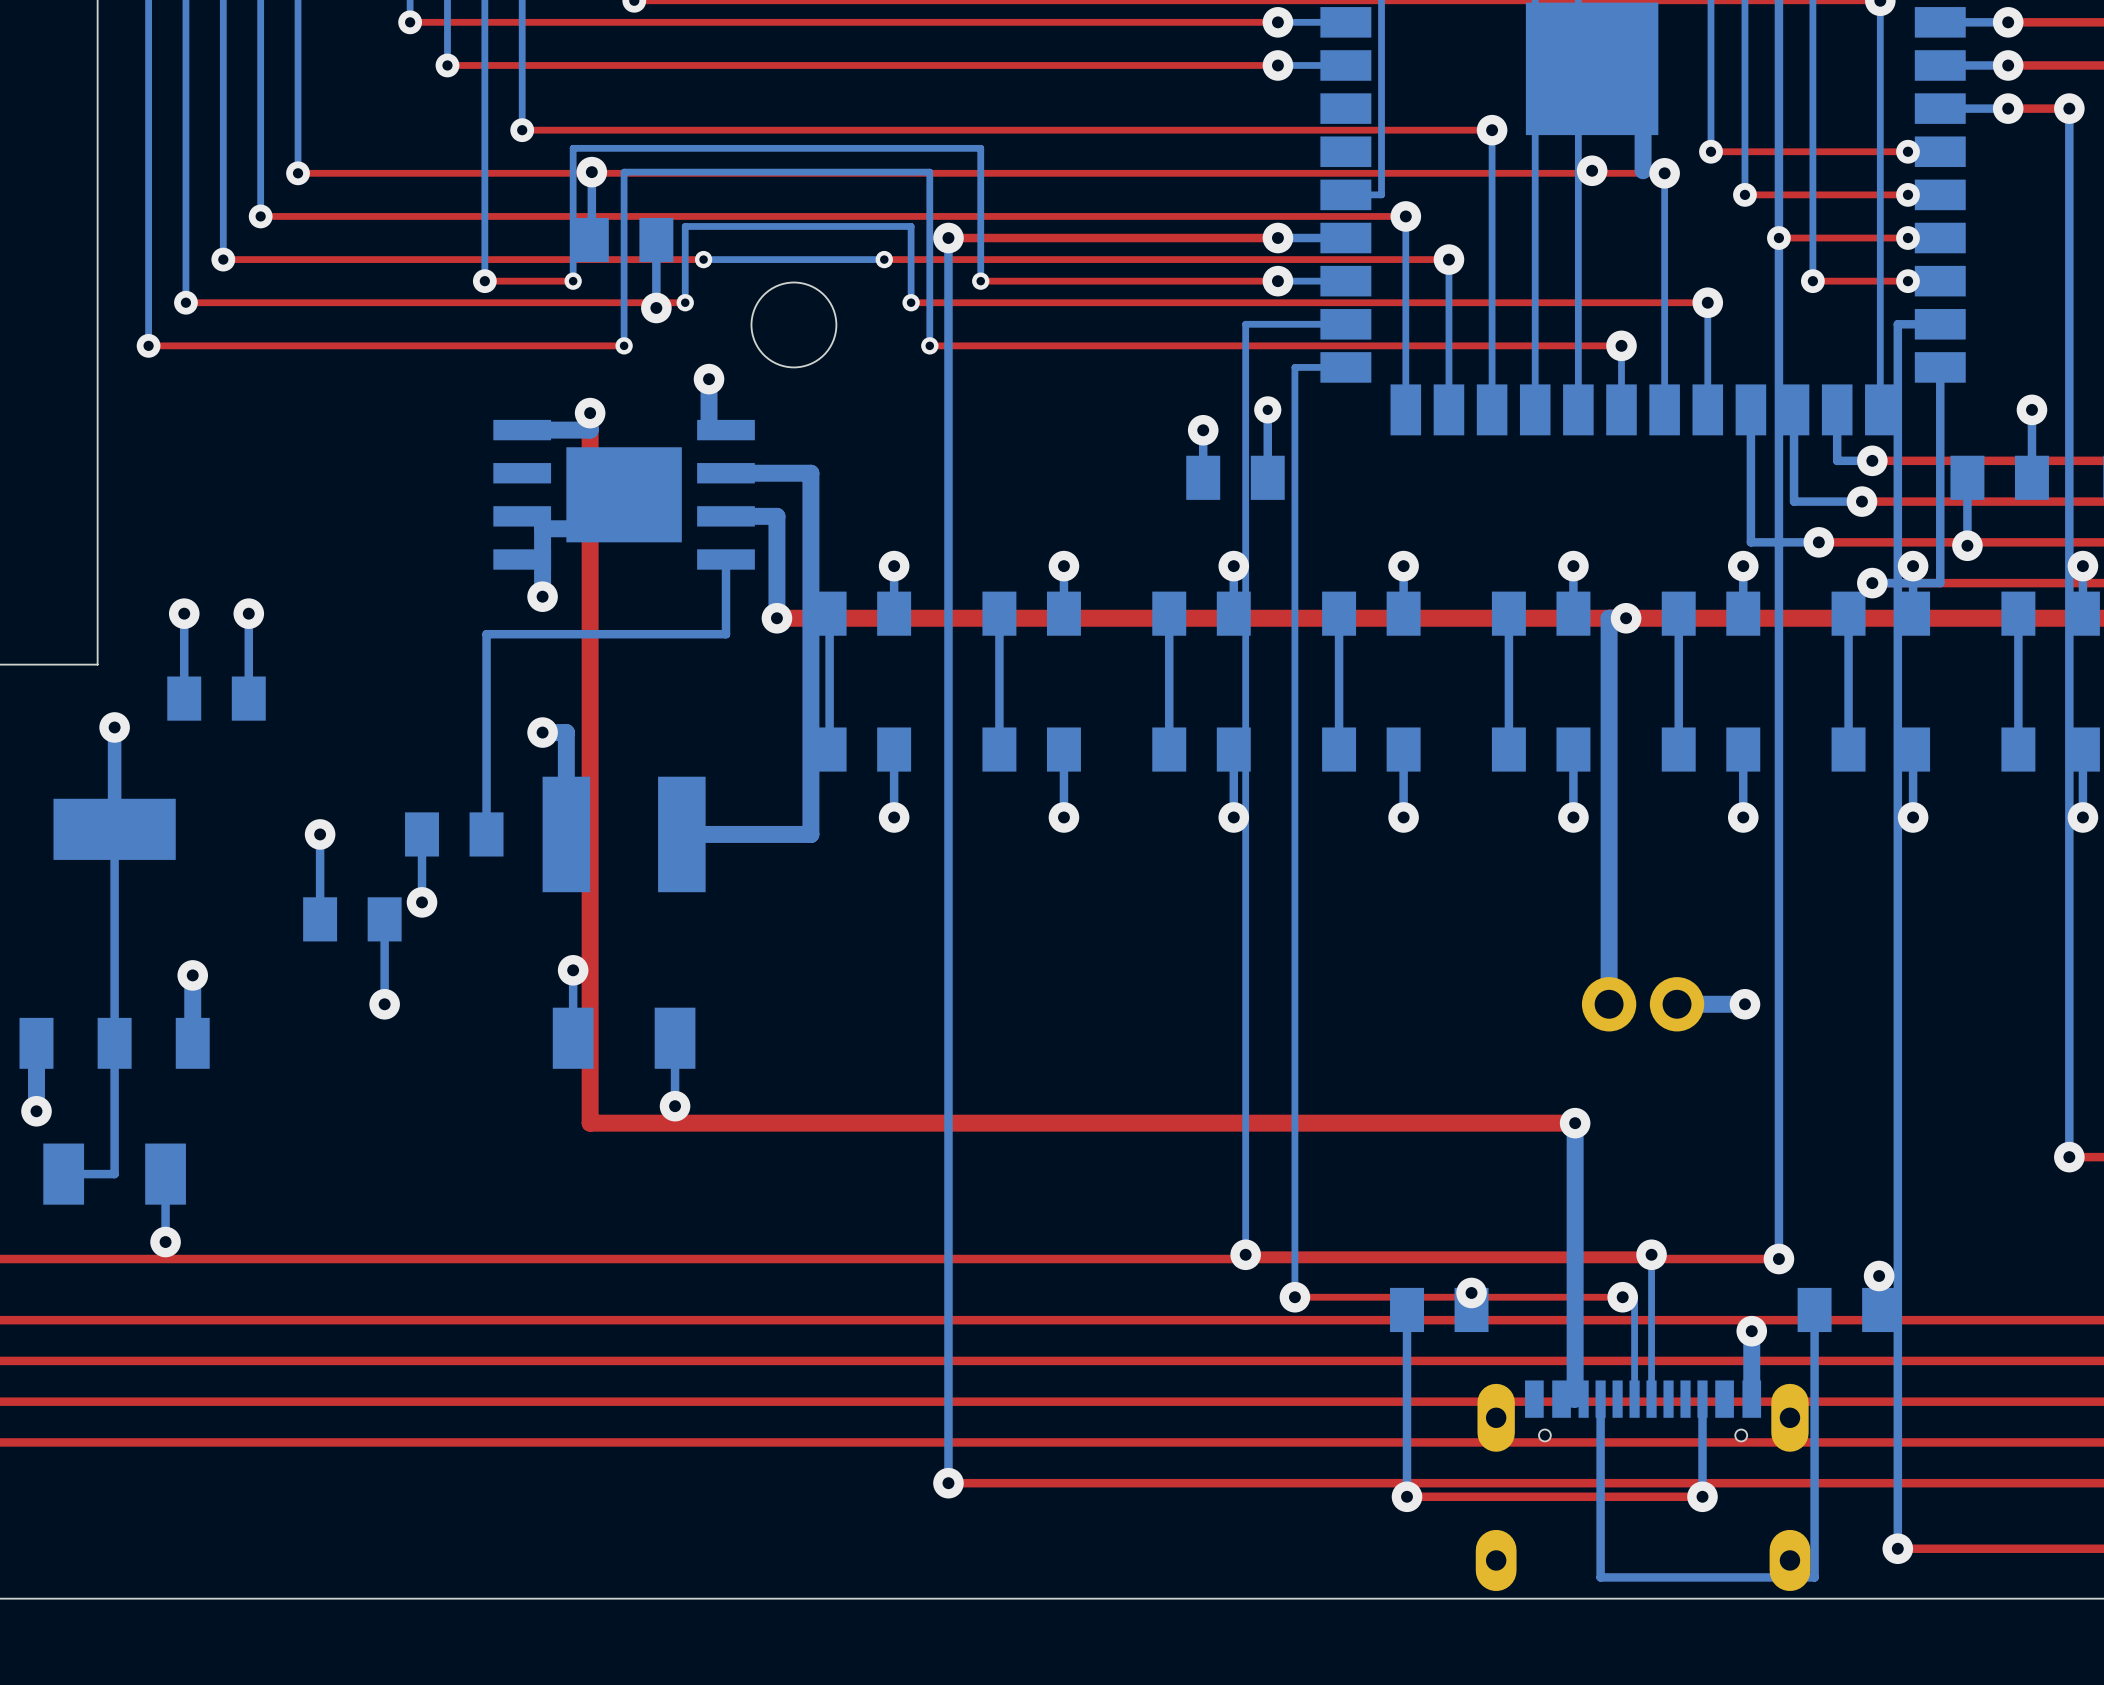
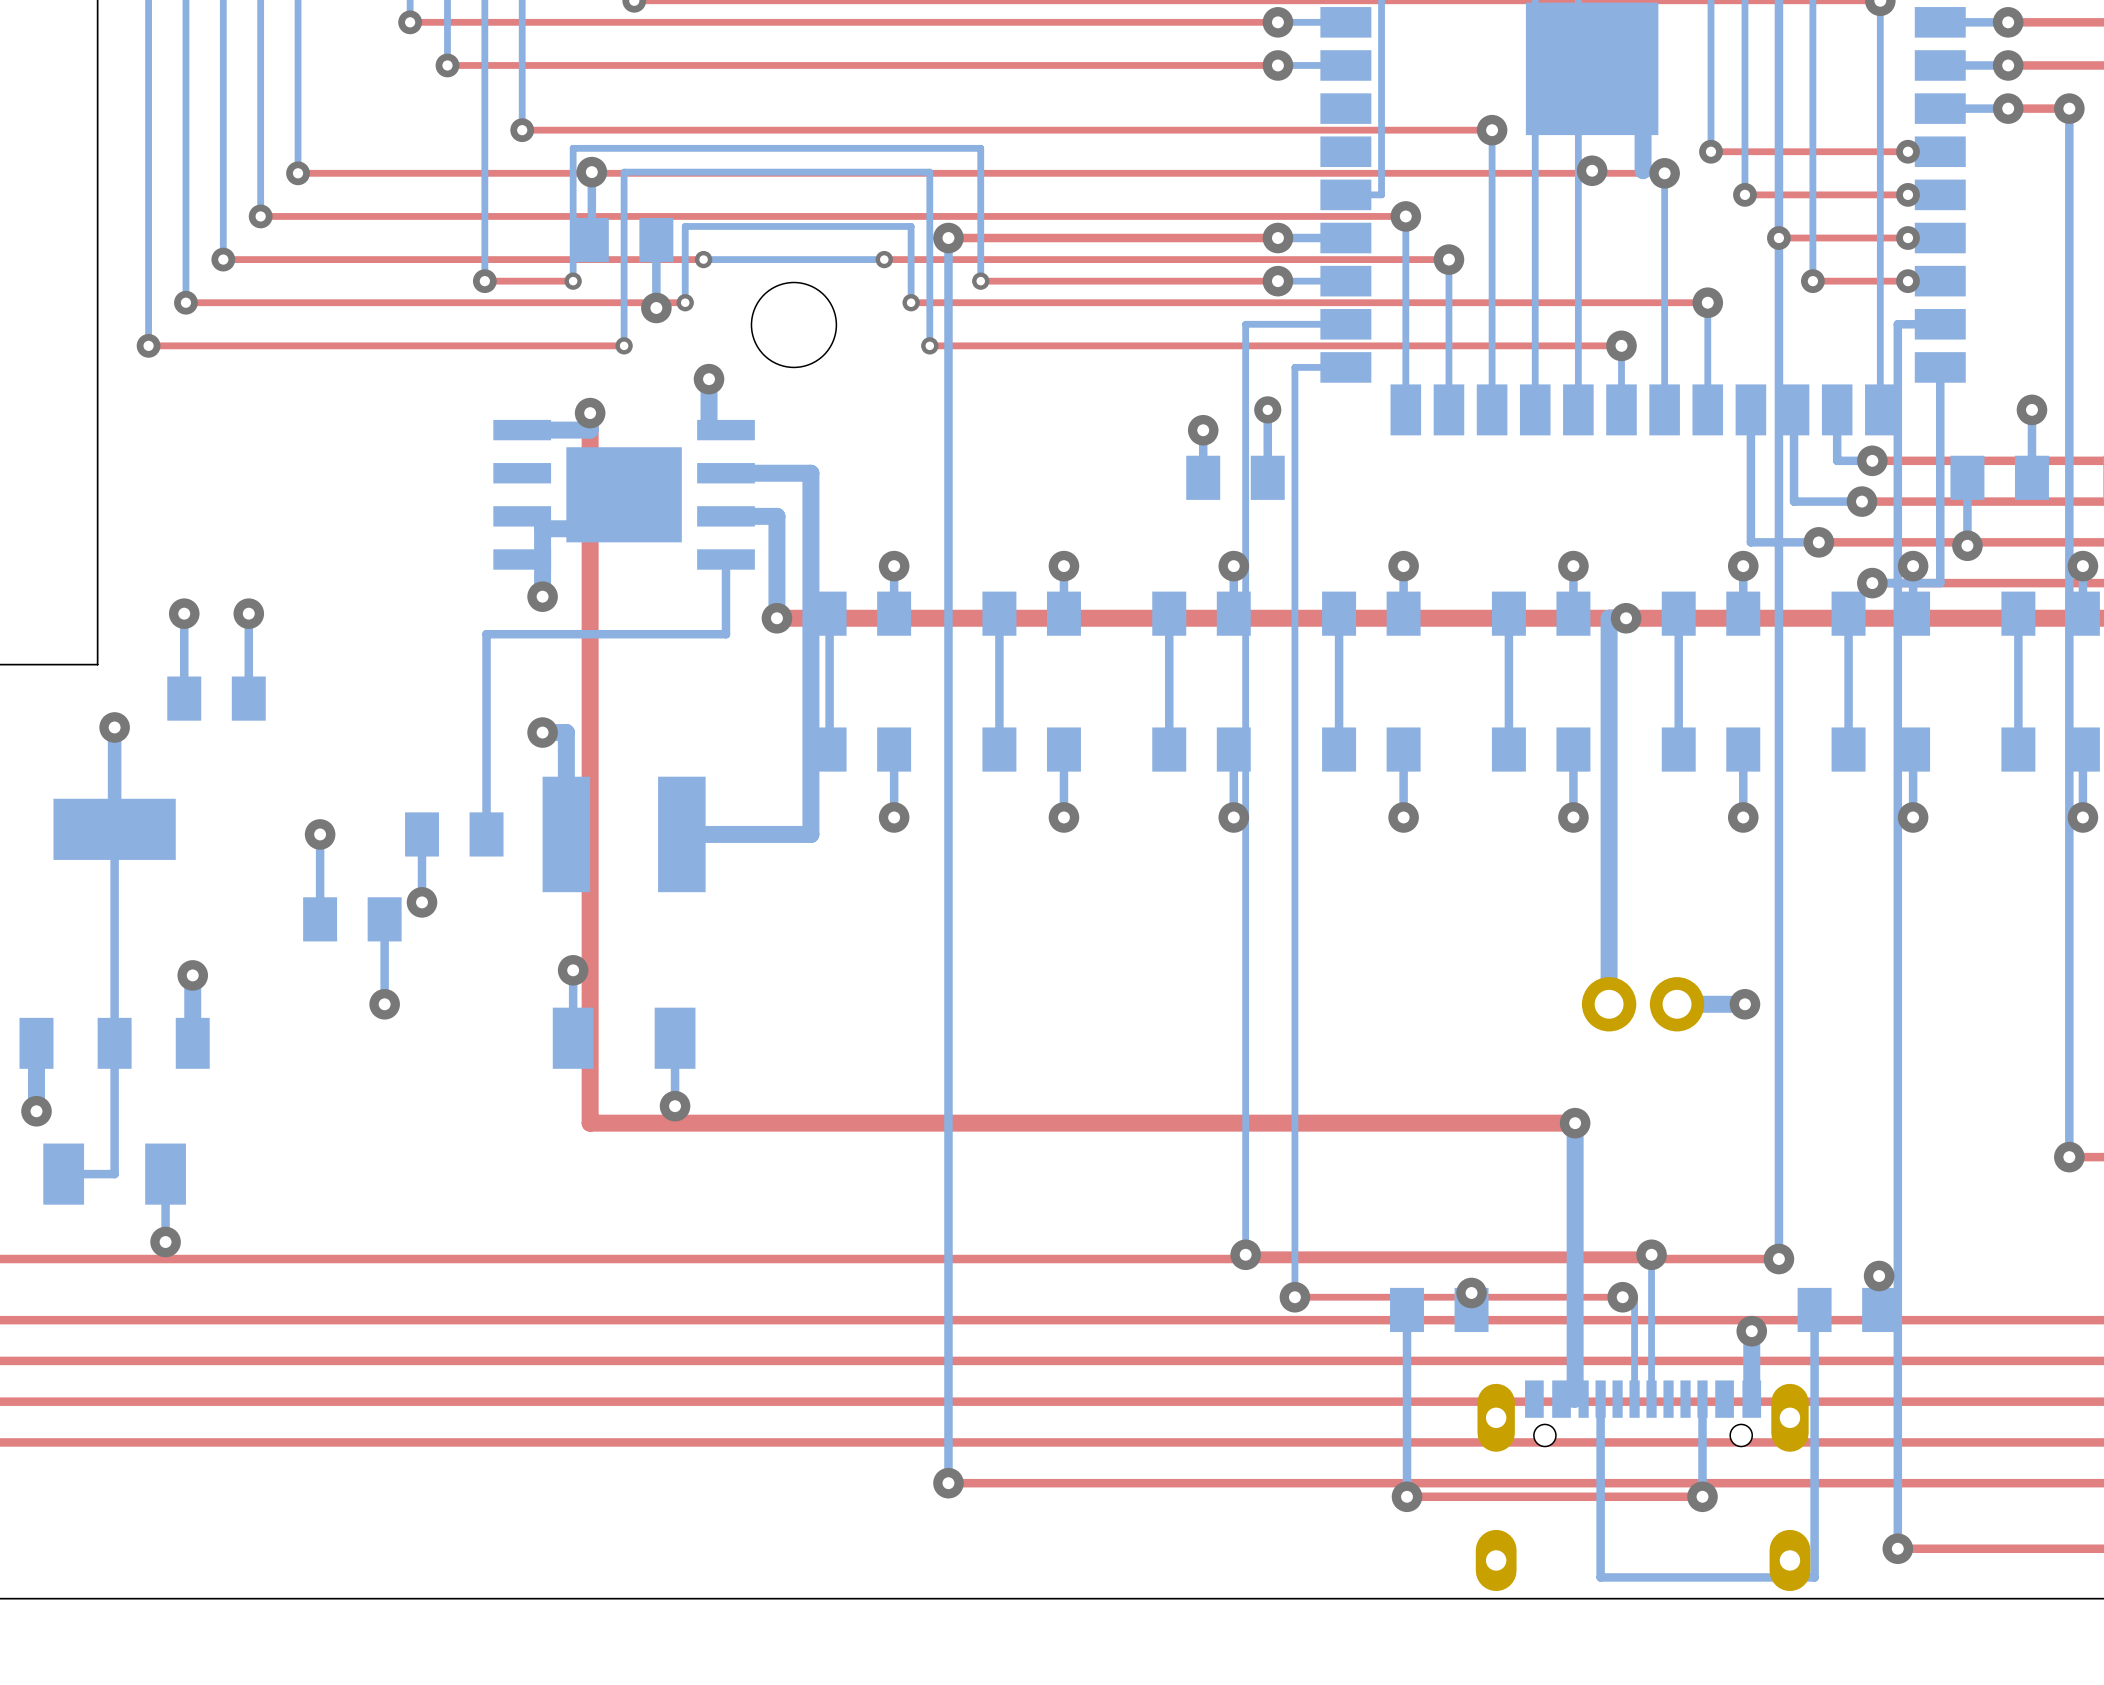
part footprint: [1475, 1380, 1811, 1592] -> [1475, 1380, 1811, 1592]

